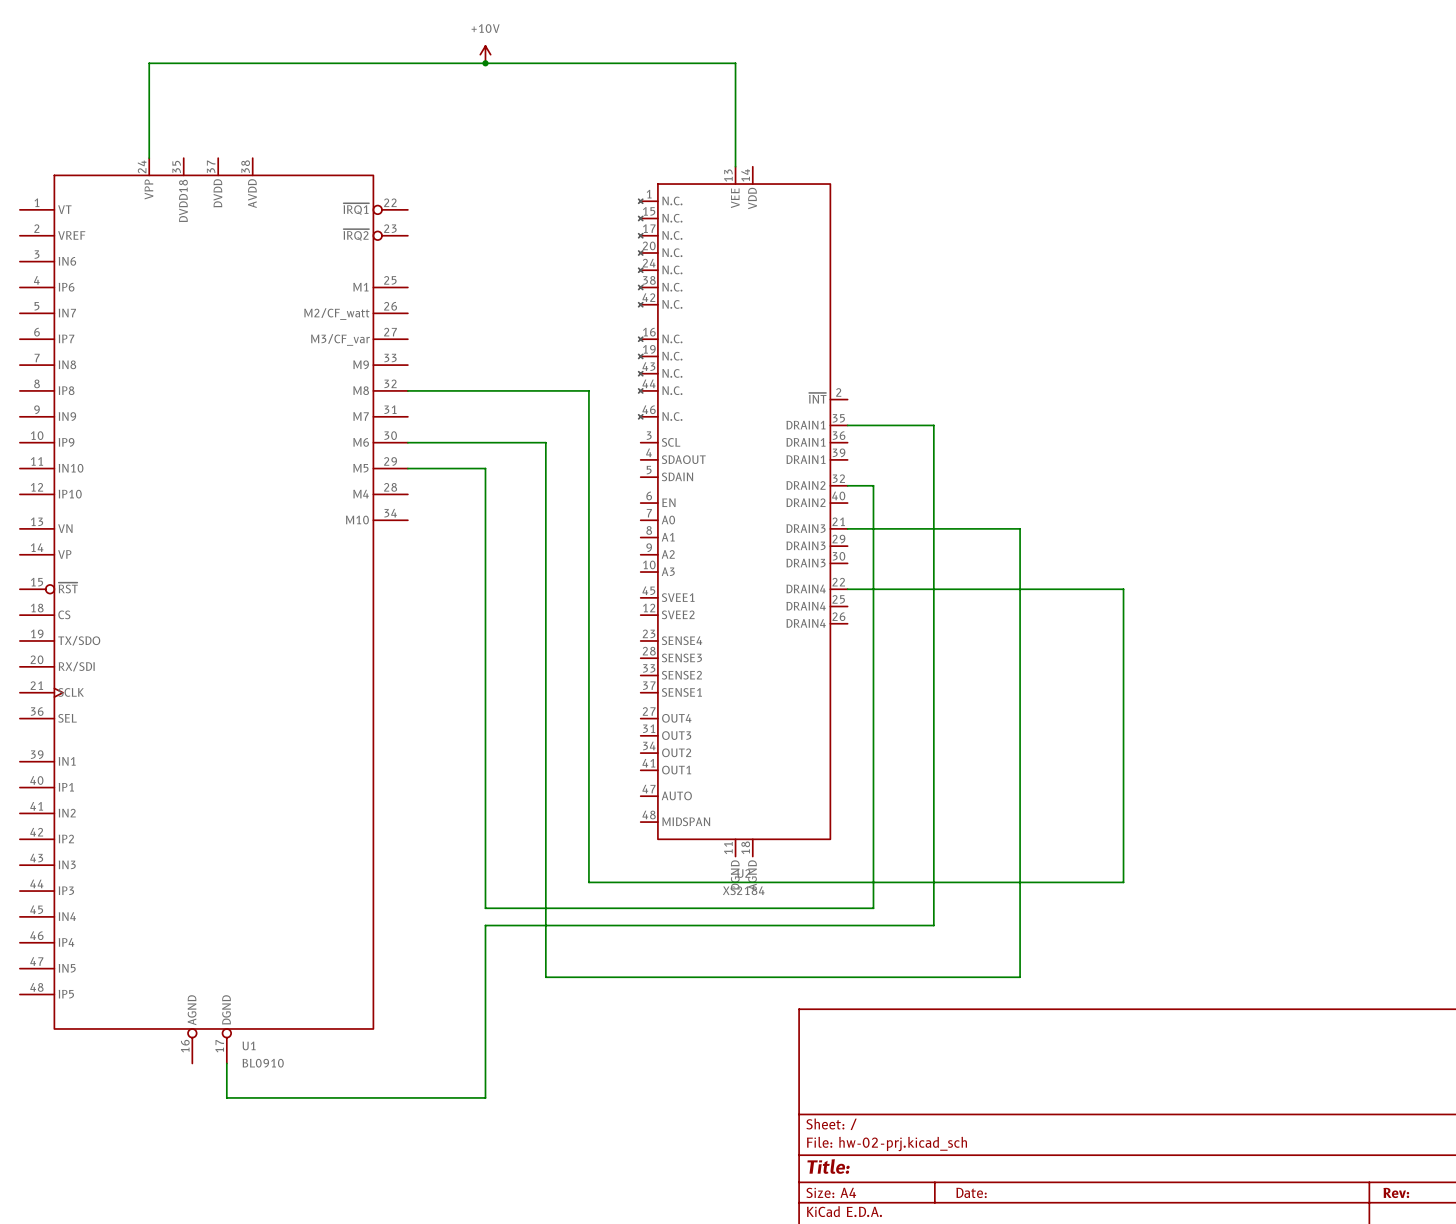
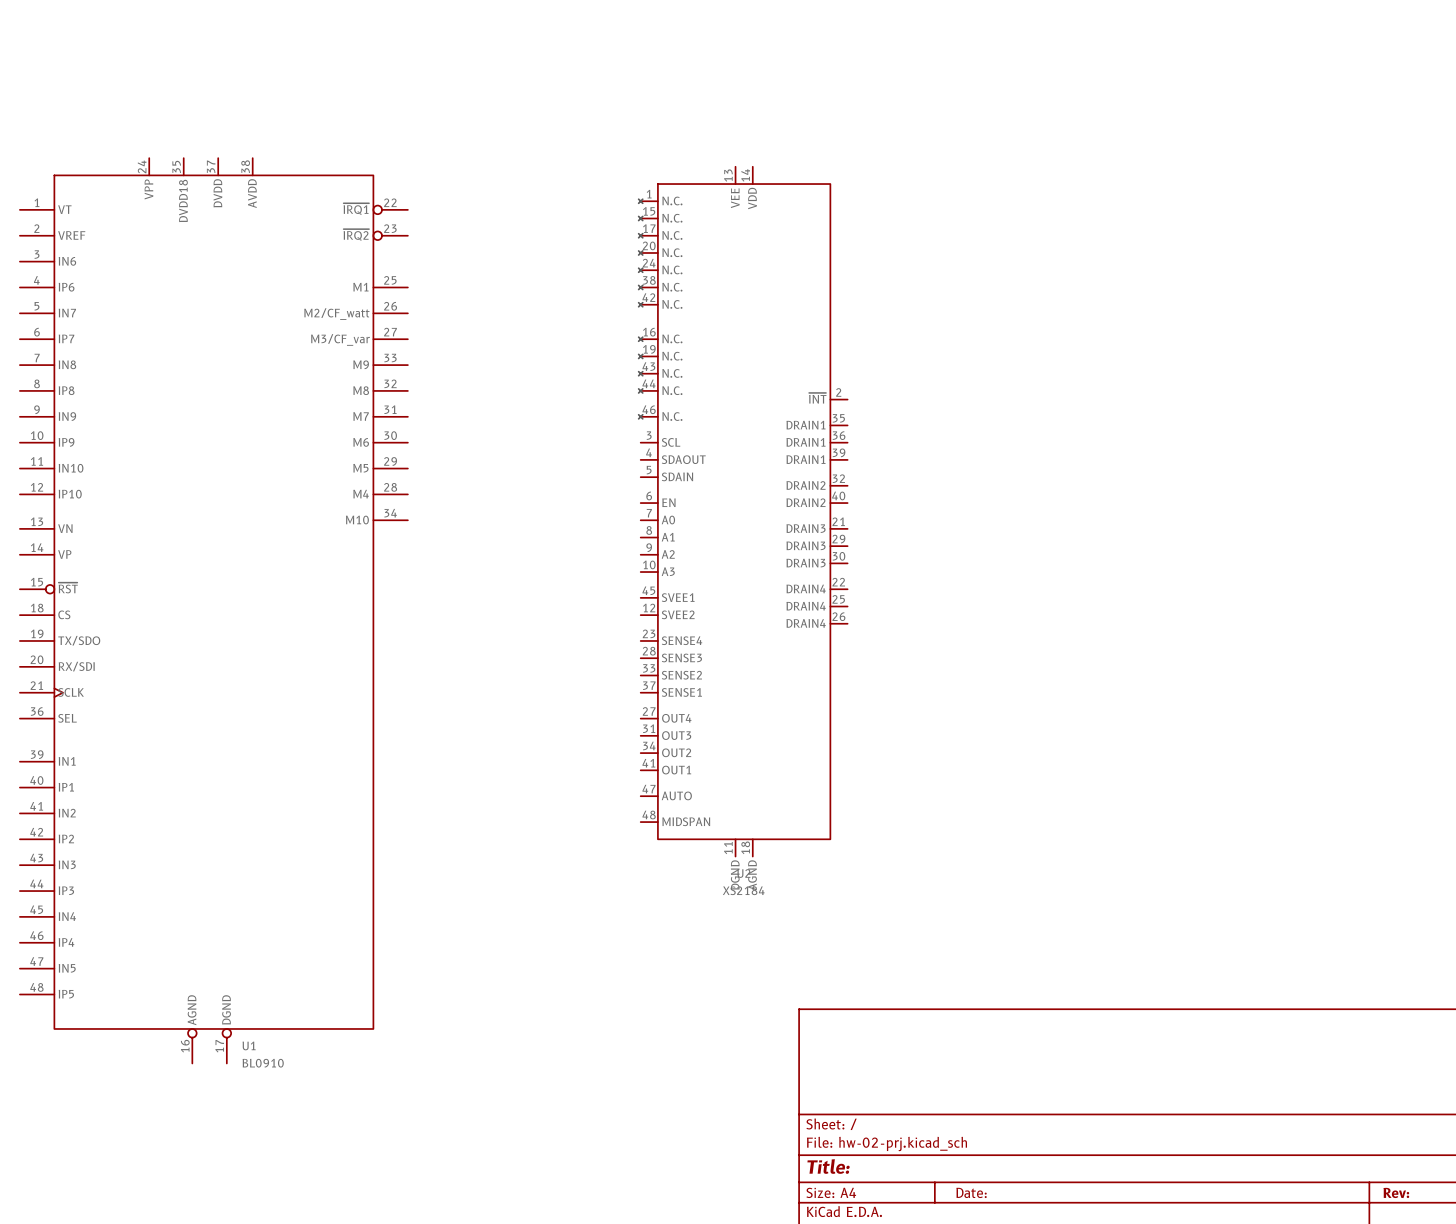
power symbol: +10V (485, 54) -> none
junction: (485, 63) -> none
wire: (149, 158) (149, 63) (735, 63) (735, 166) -> none
wire: (407, 390) (588, 390) (588, 882) (1123, 882) (1123, 589) (847, 589) -> none
wire: (847, 425) (933, 425) (933, 925) (485, 925) (485, 1097) (226, 1097) (226, 1063) -> none
wire: (407, 442) (545, 442) (545, 977) (1020, 977) (1020, 528) (847, 528) -> none
wire: (407, 468) (485, 468) (485, 908) (873, 908) (873, 485) (847, 485) -> none

